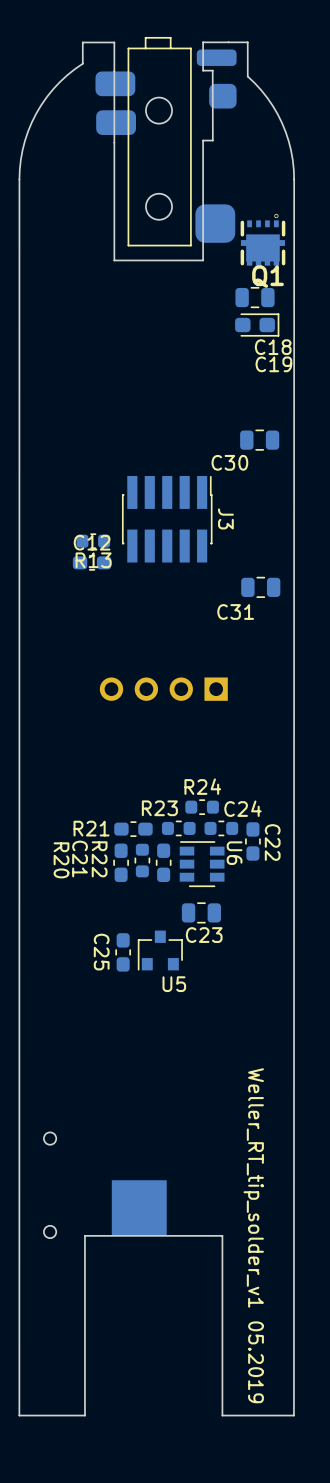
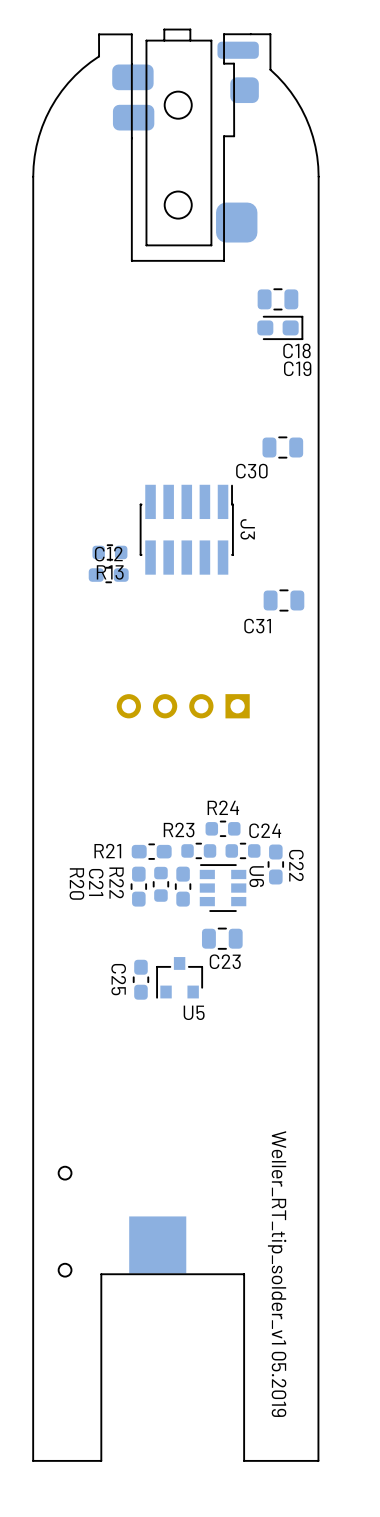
Q1: (262, 239) -> none

